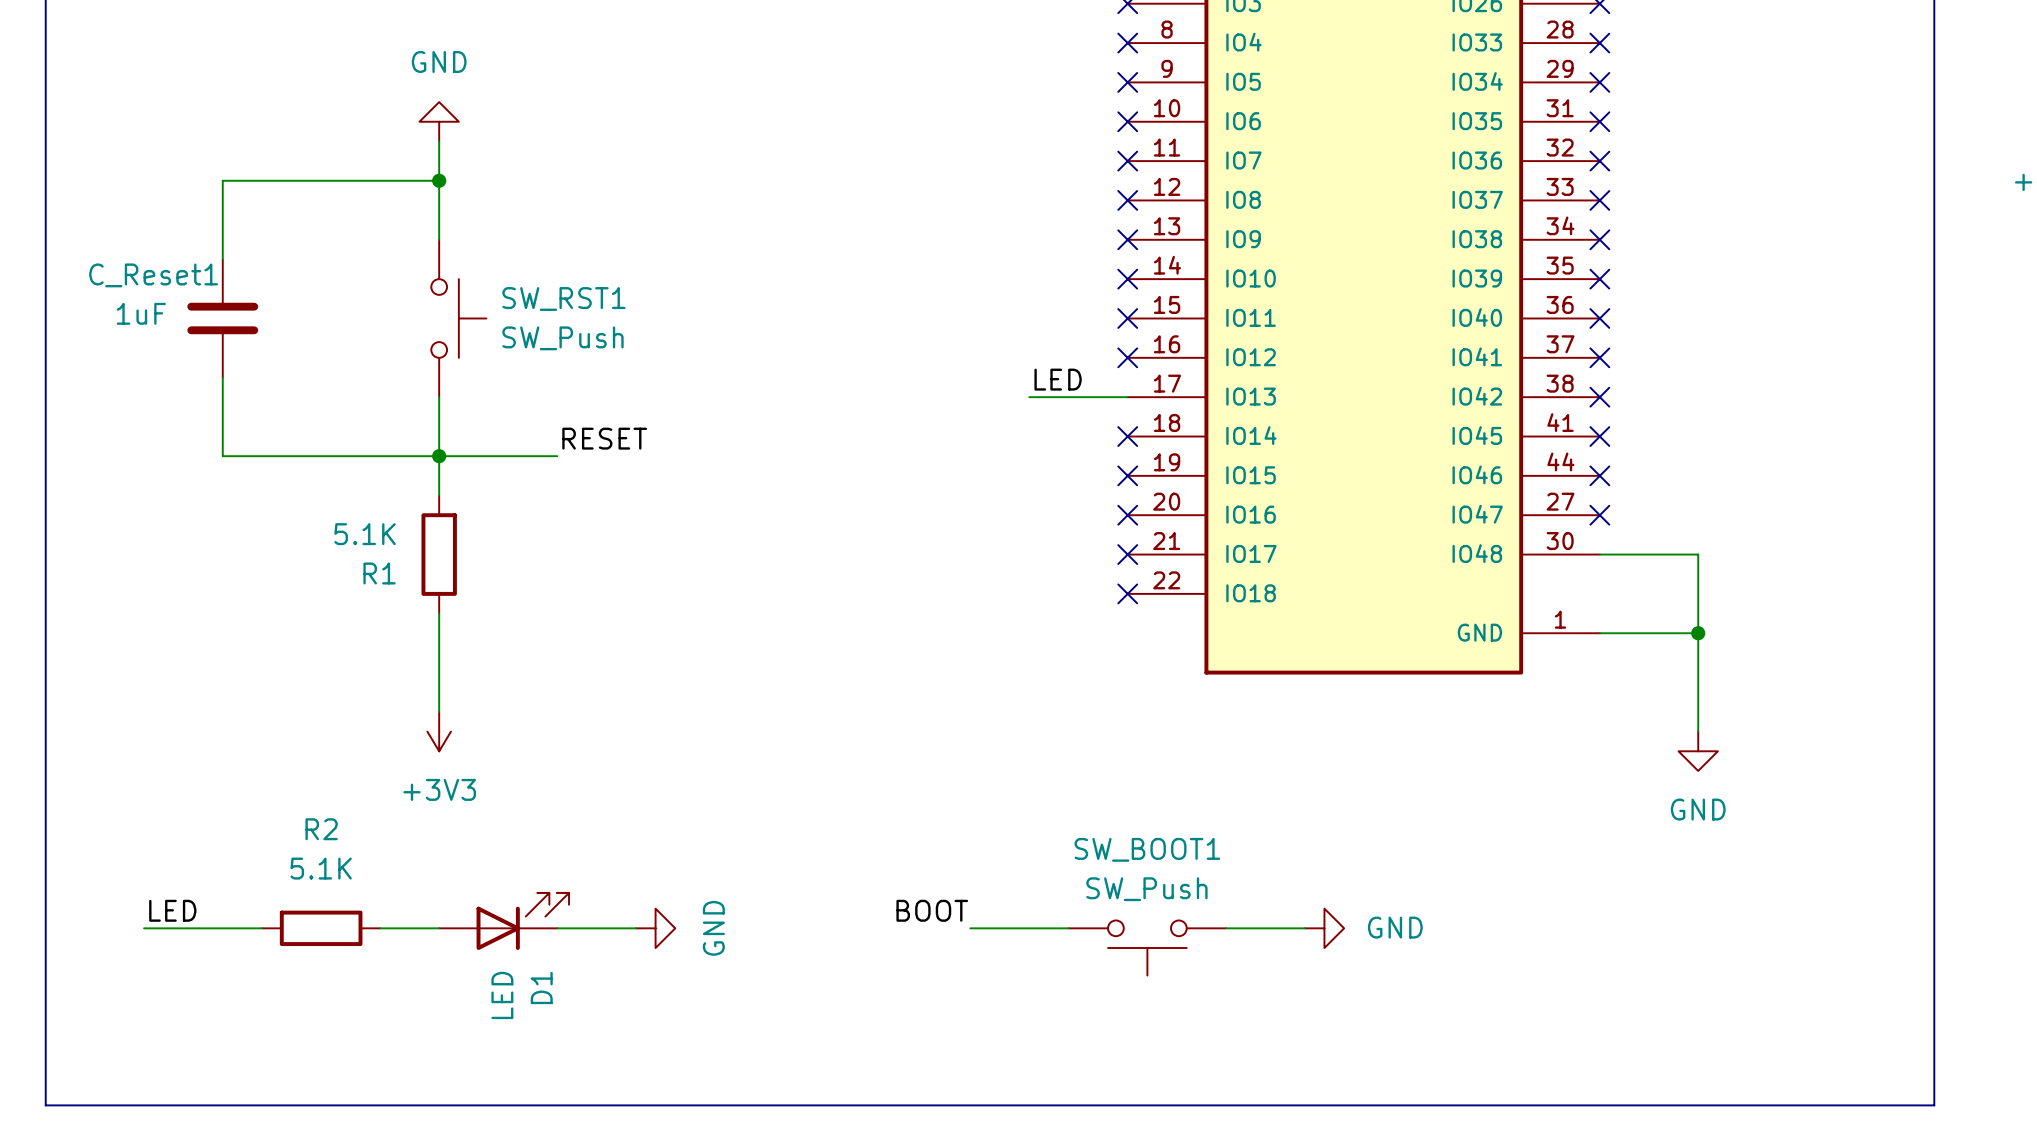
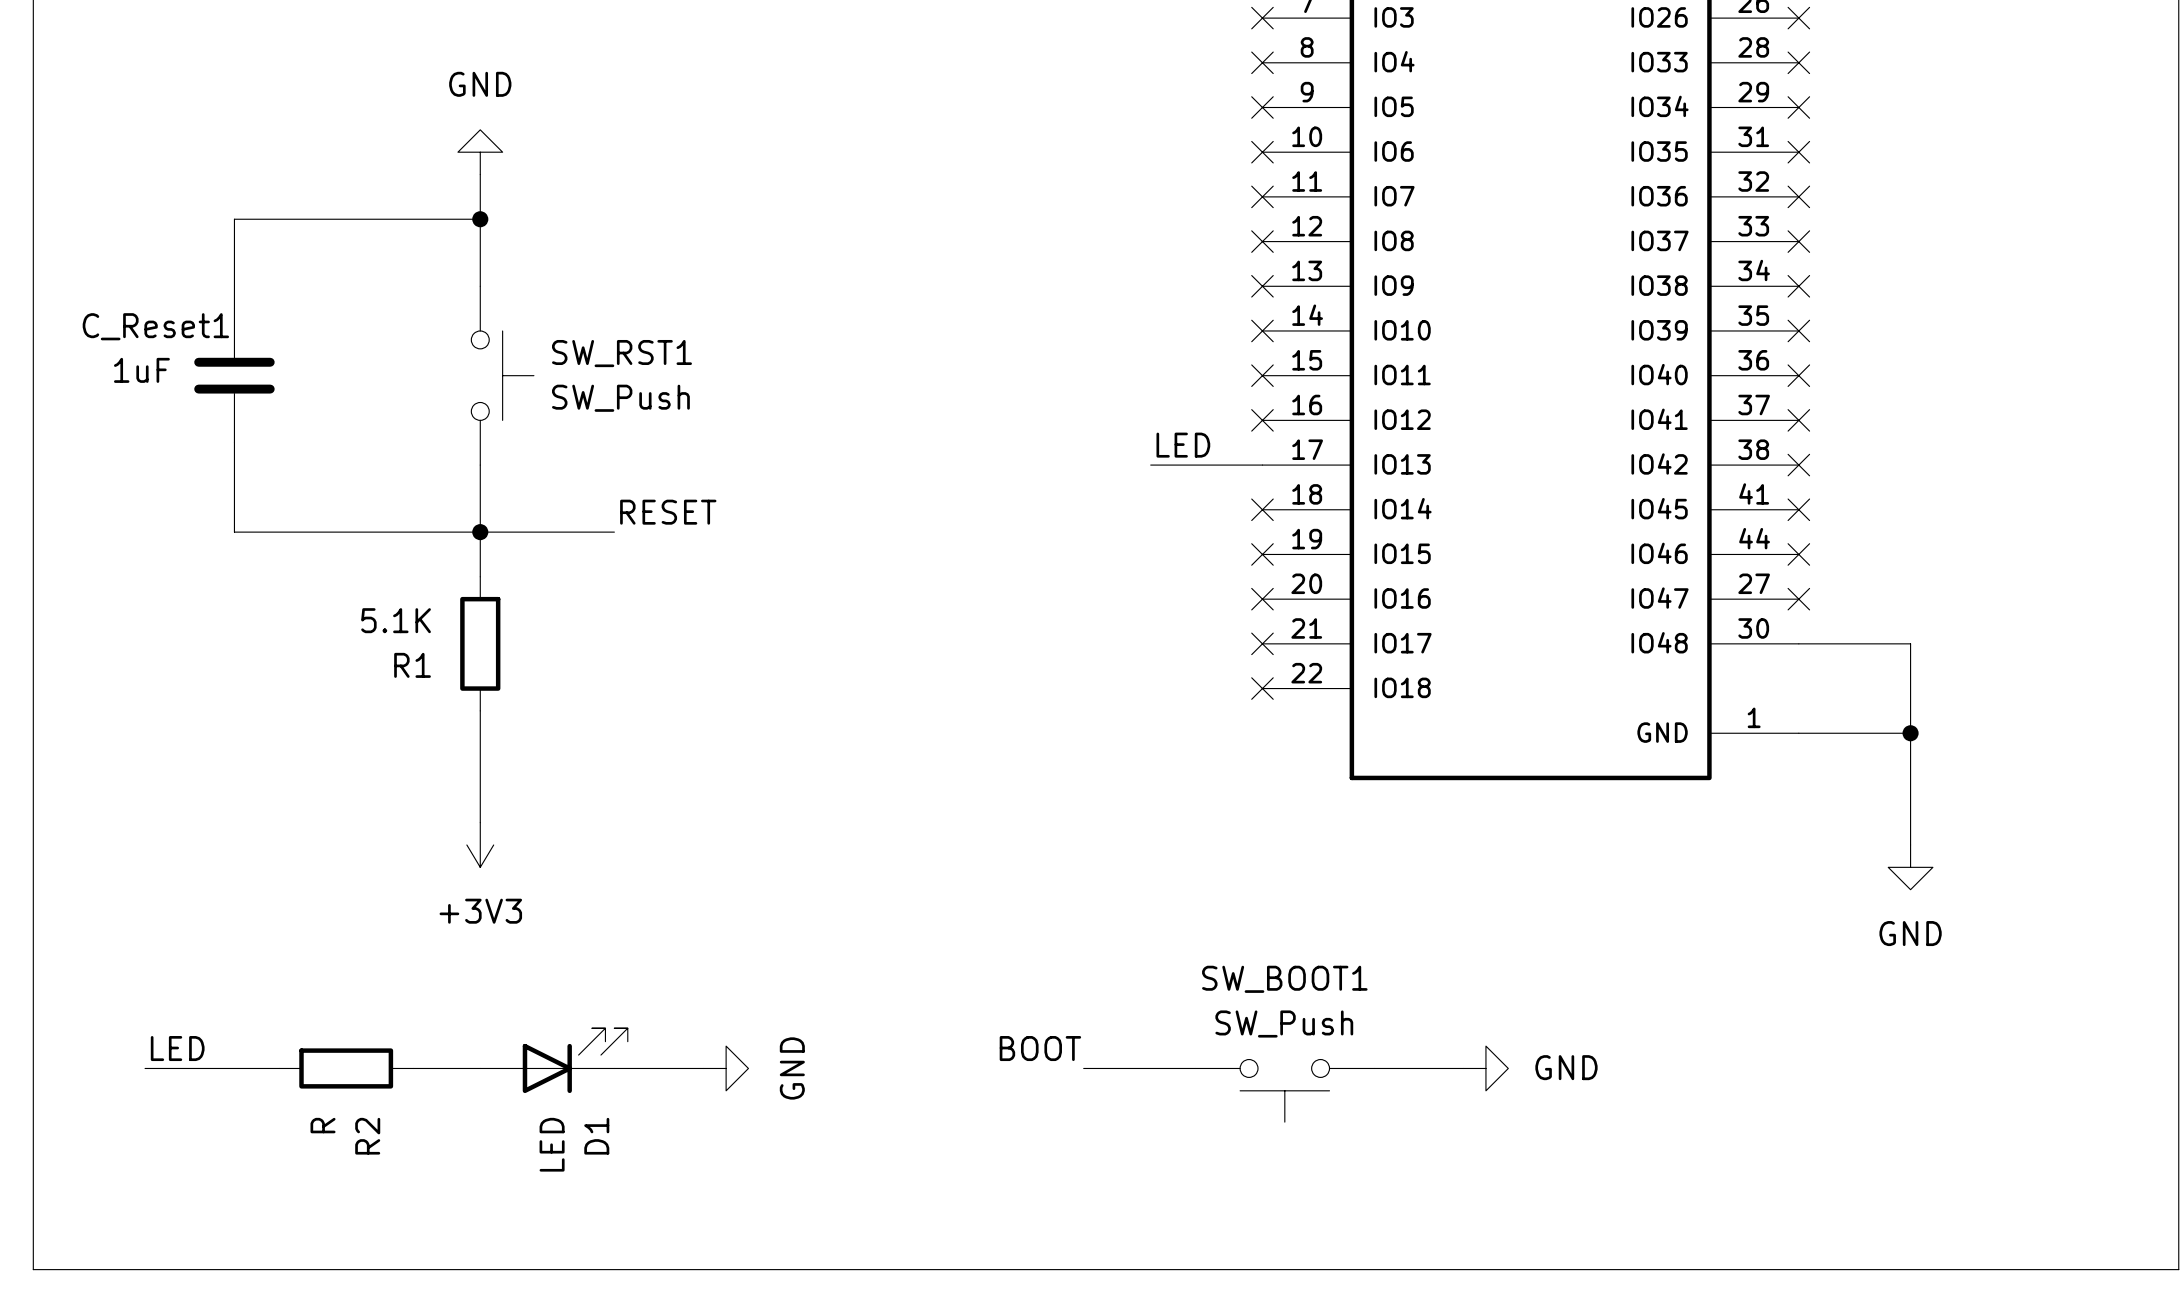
R2 name rotation: 0° (321, 829) -> 90° counterclockwise (367, 1136)
R2 name position: R2 (321, 829) -> R2 (367, 1136)
R2 value: 5.1K (321, 868) -> R (323, 1125)

